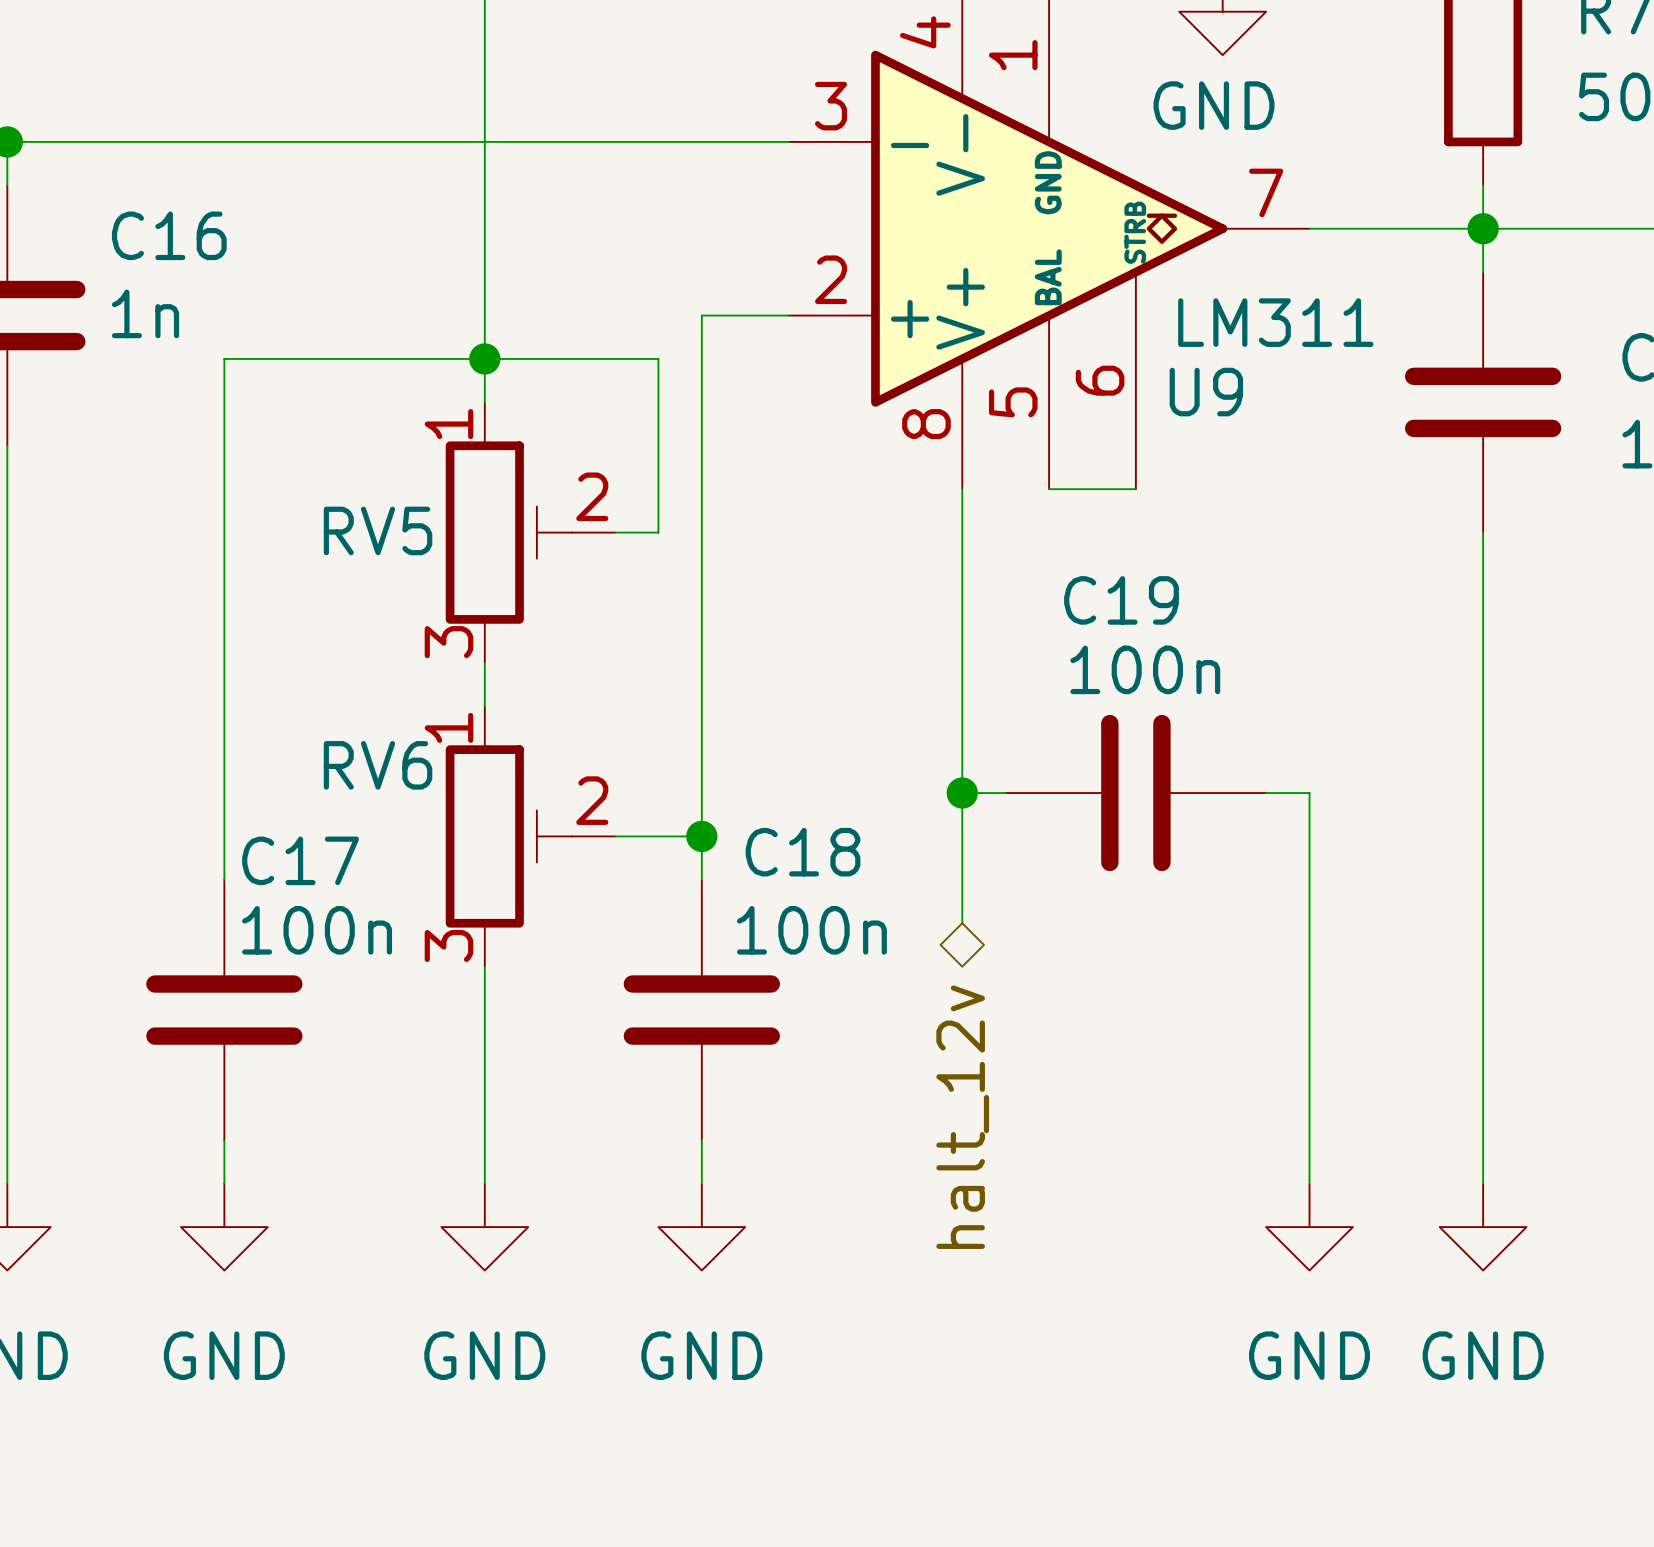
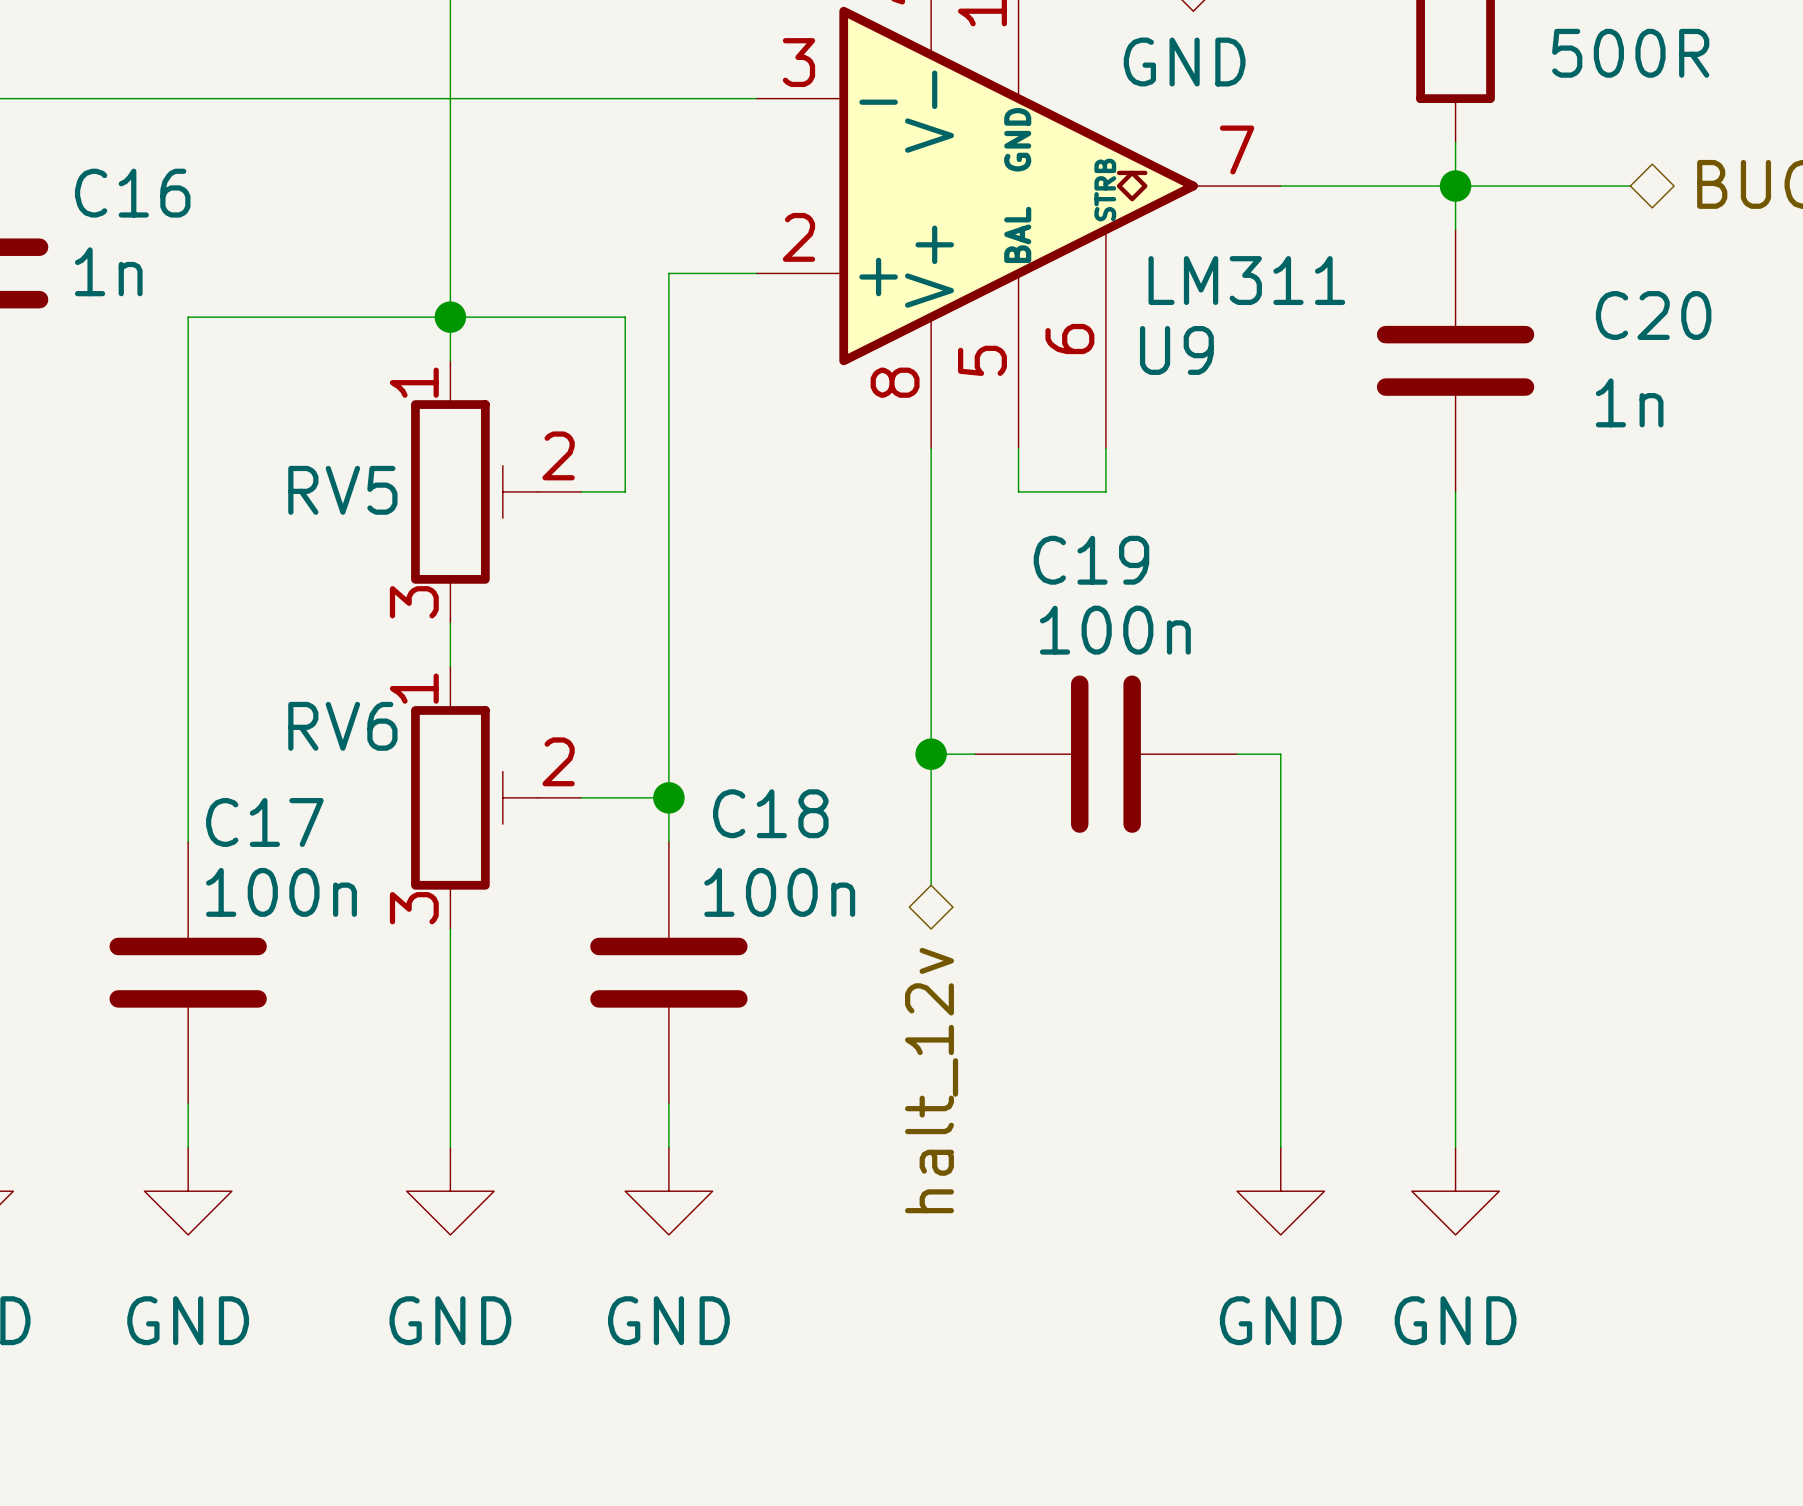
wire: (1049, 489) (1135, 489) -> (1018, 448) (1018, 491) (1105, 491) (1105, 448)

